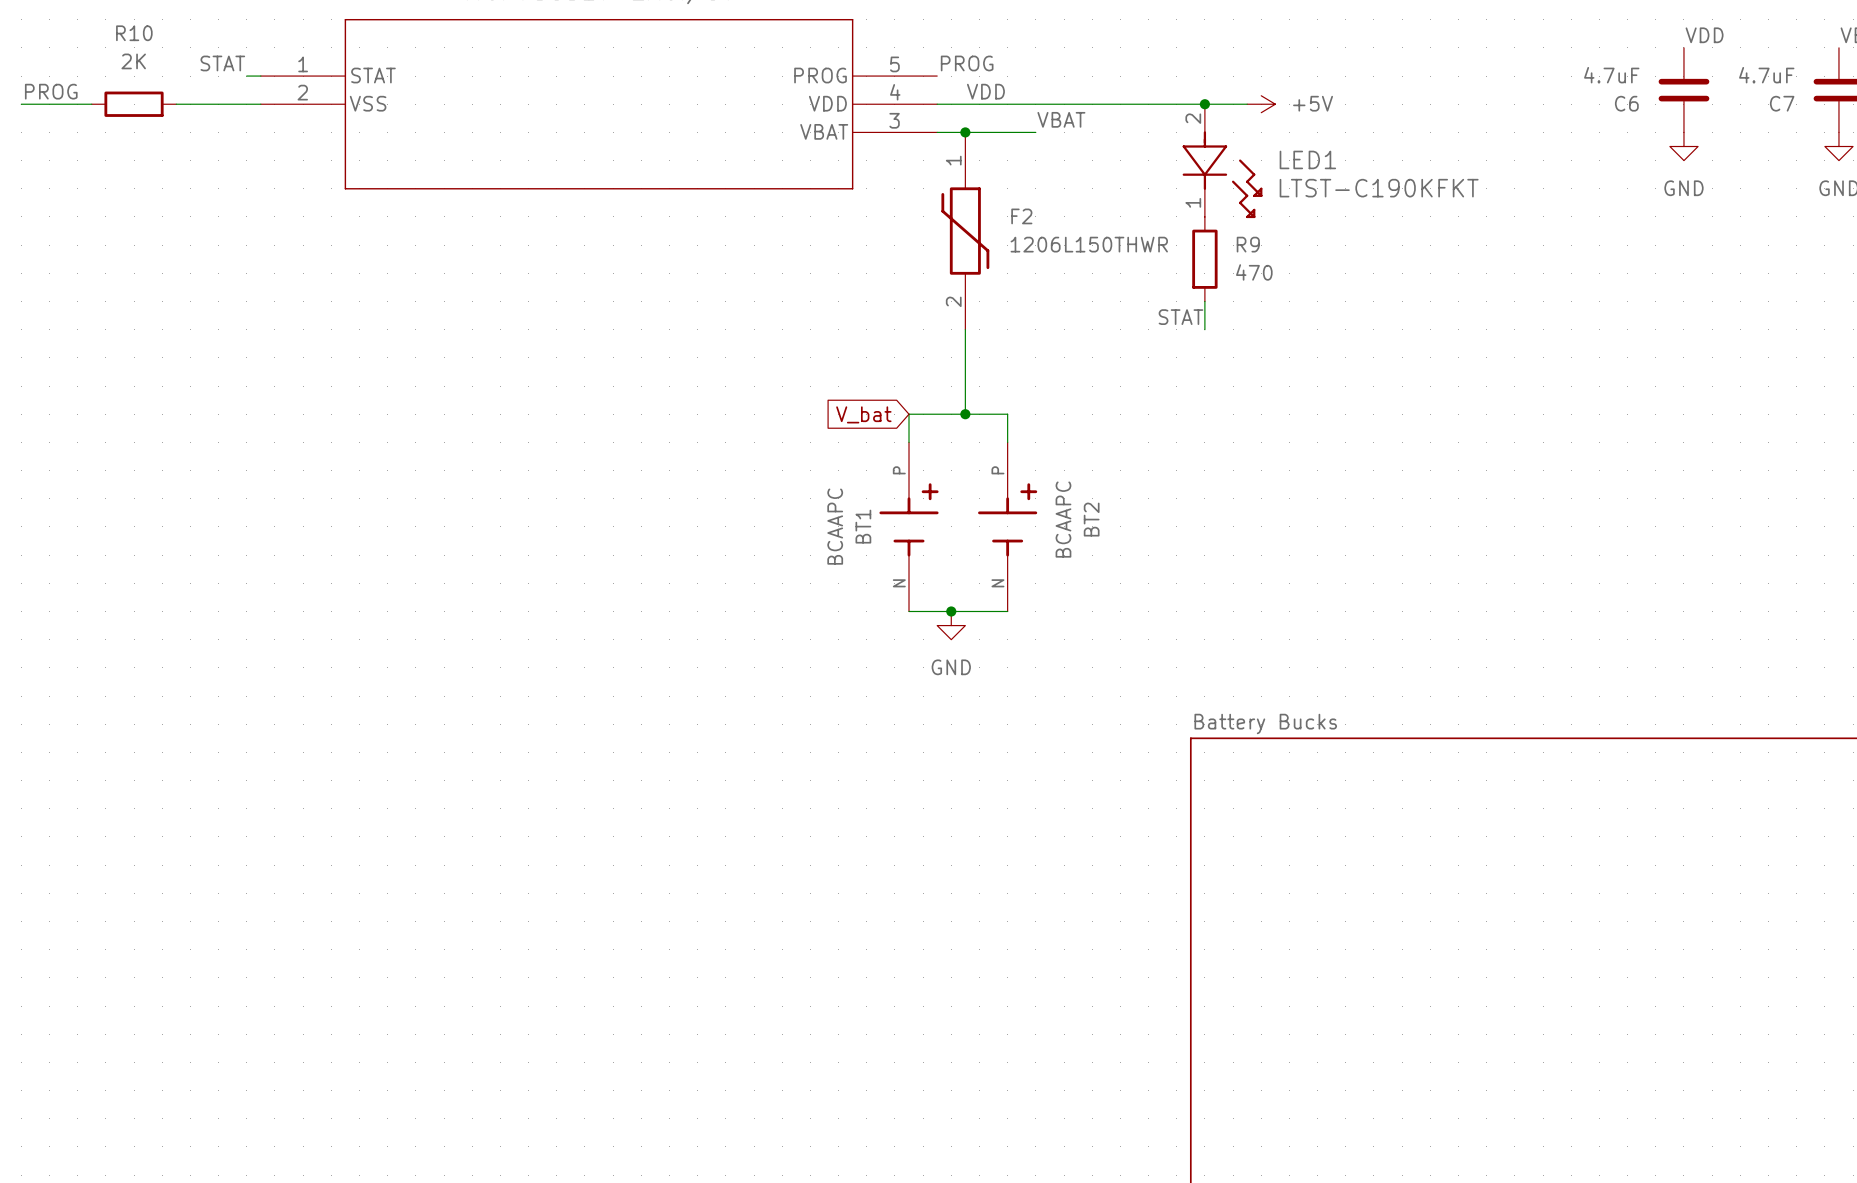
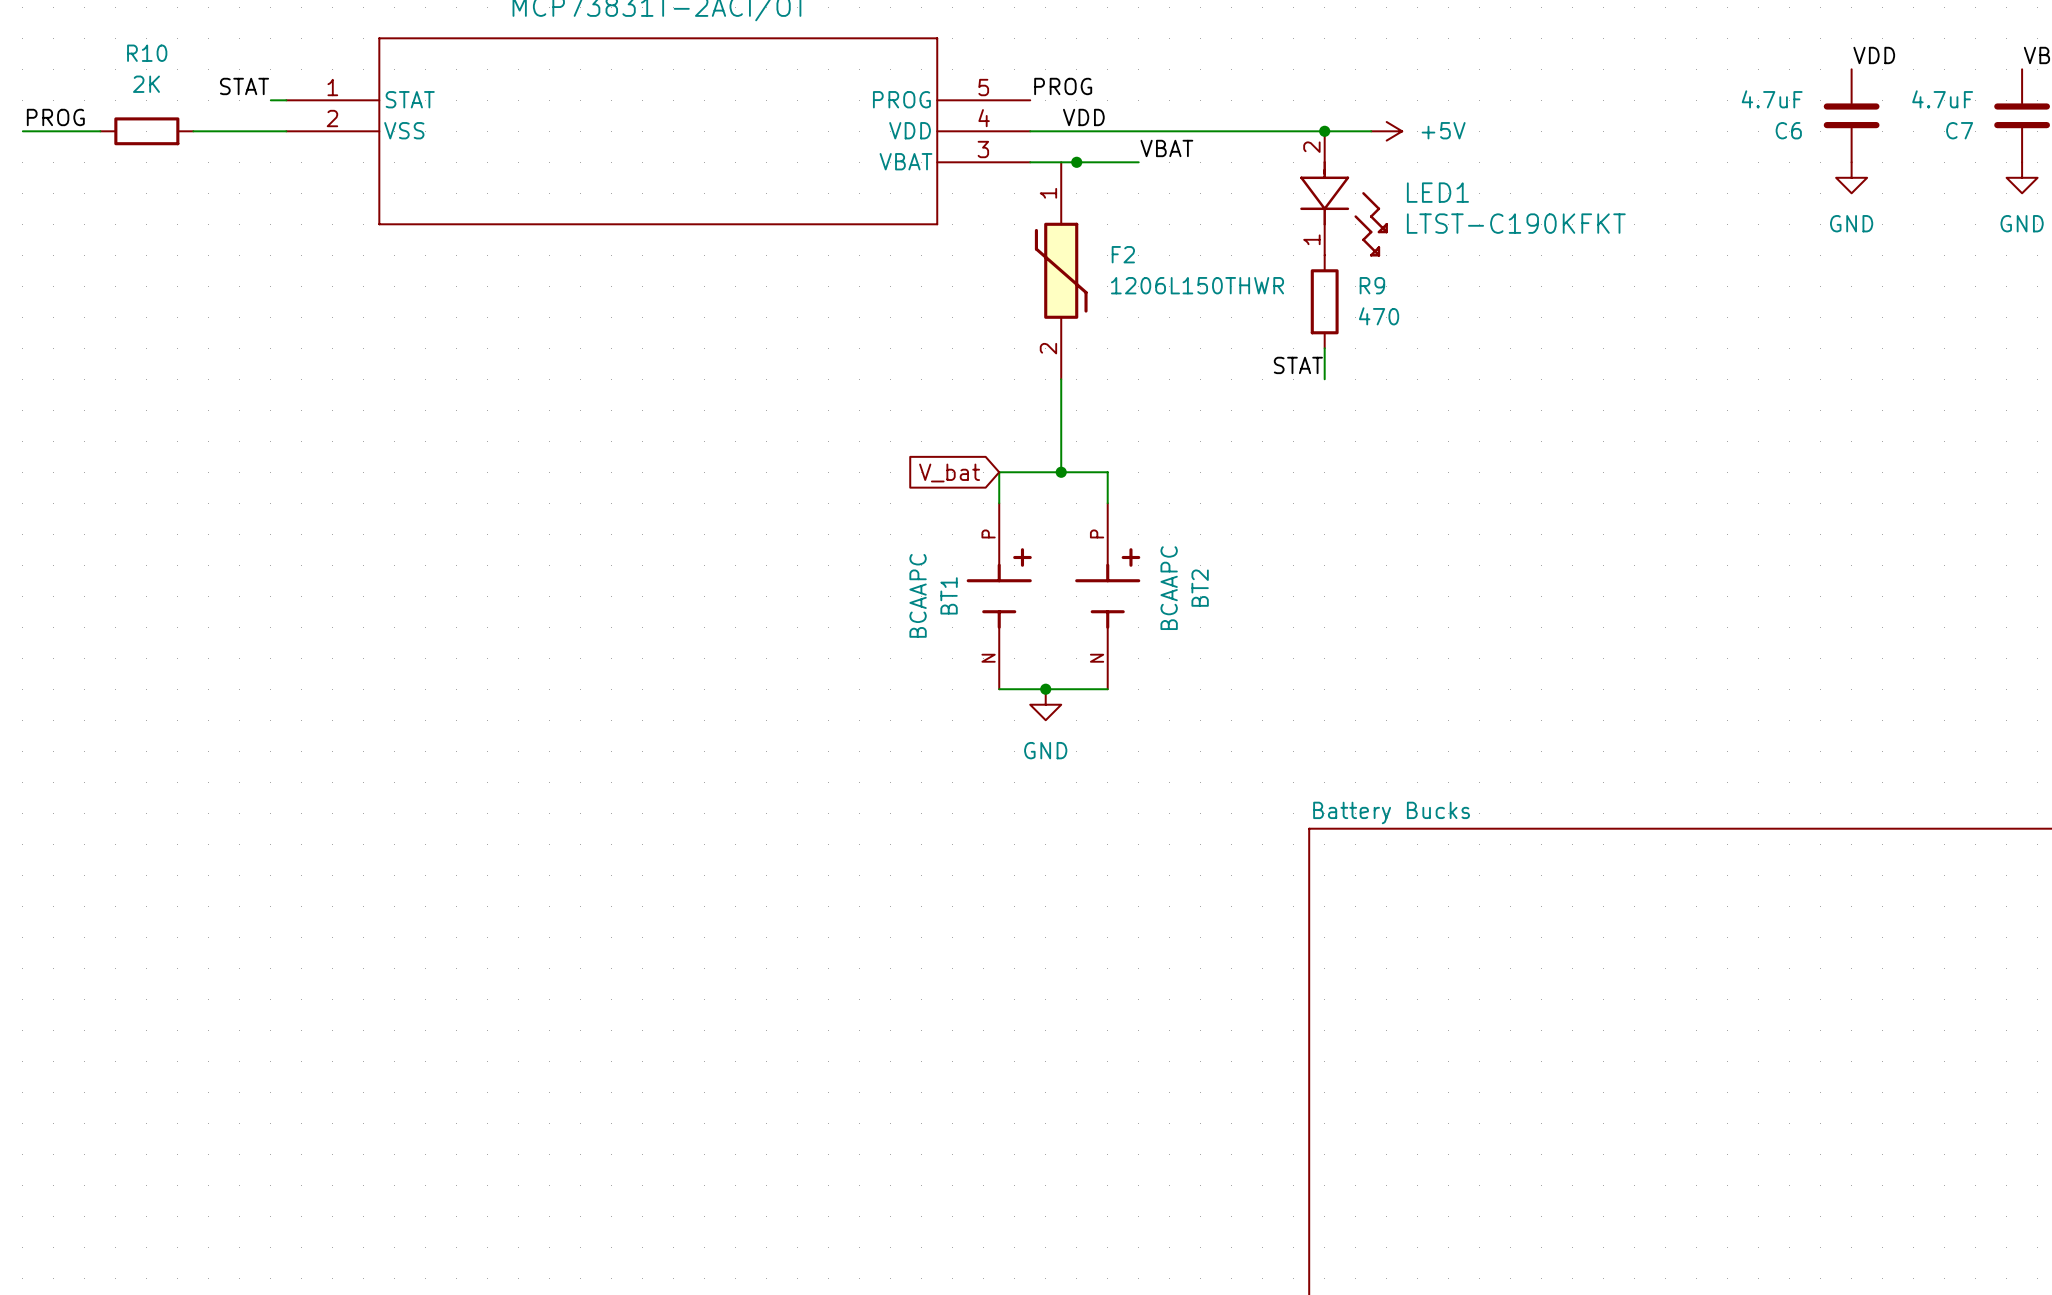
junction position: (965, 132) -> (1076, 162)

